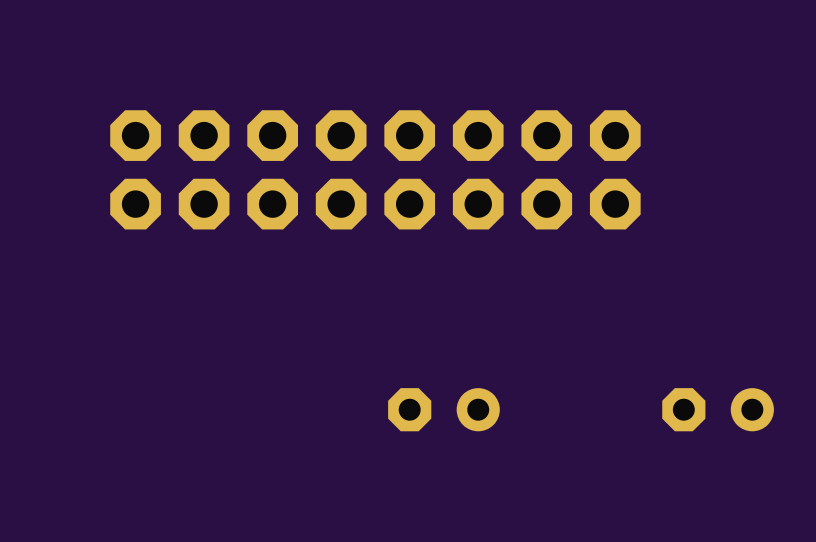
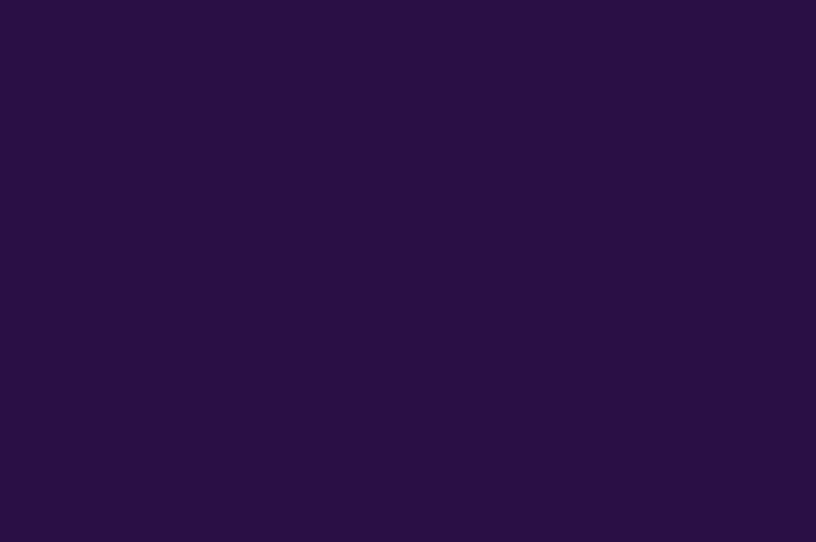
part: (375, 169) -> none
part: (443, 409) -> none
part: (718, 409) -> none

